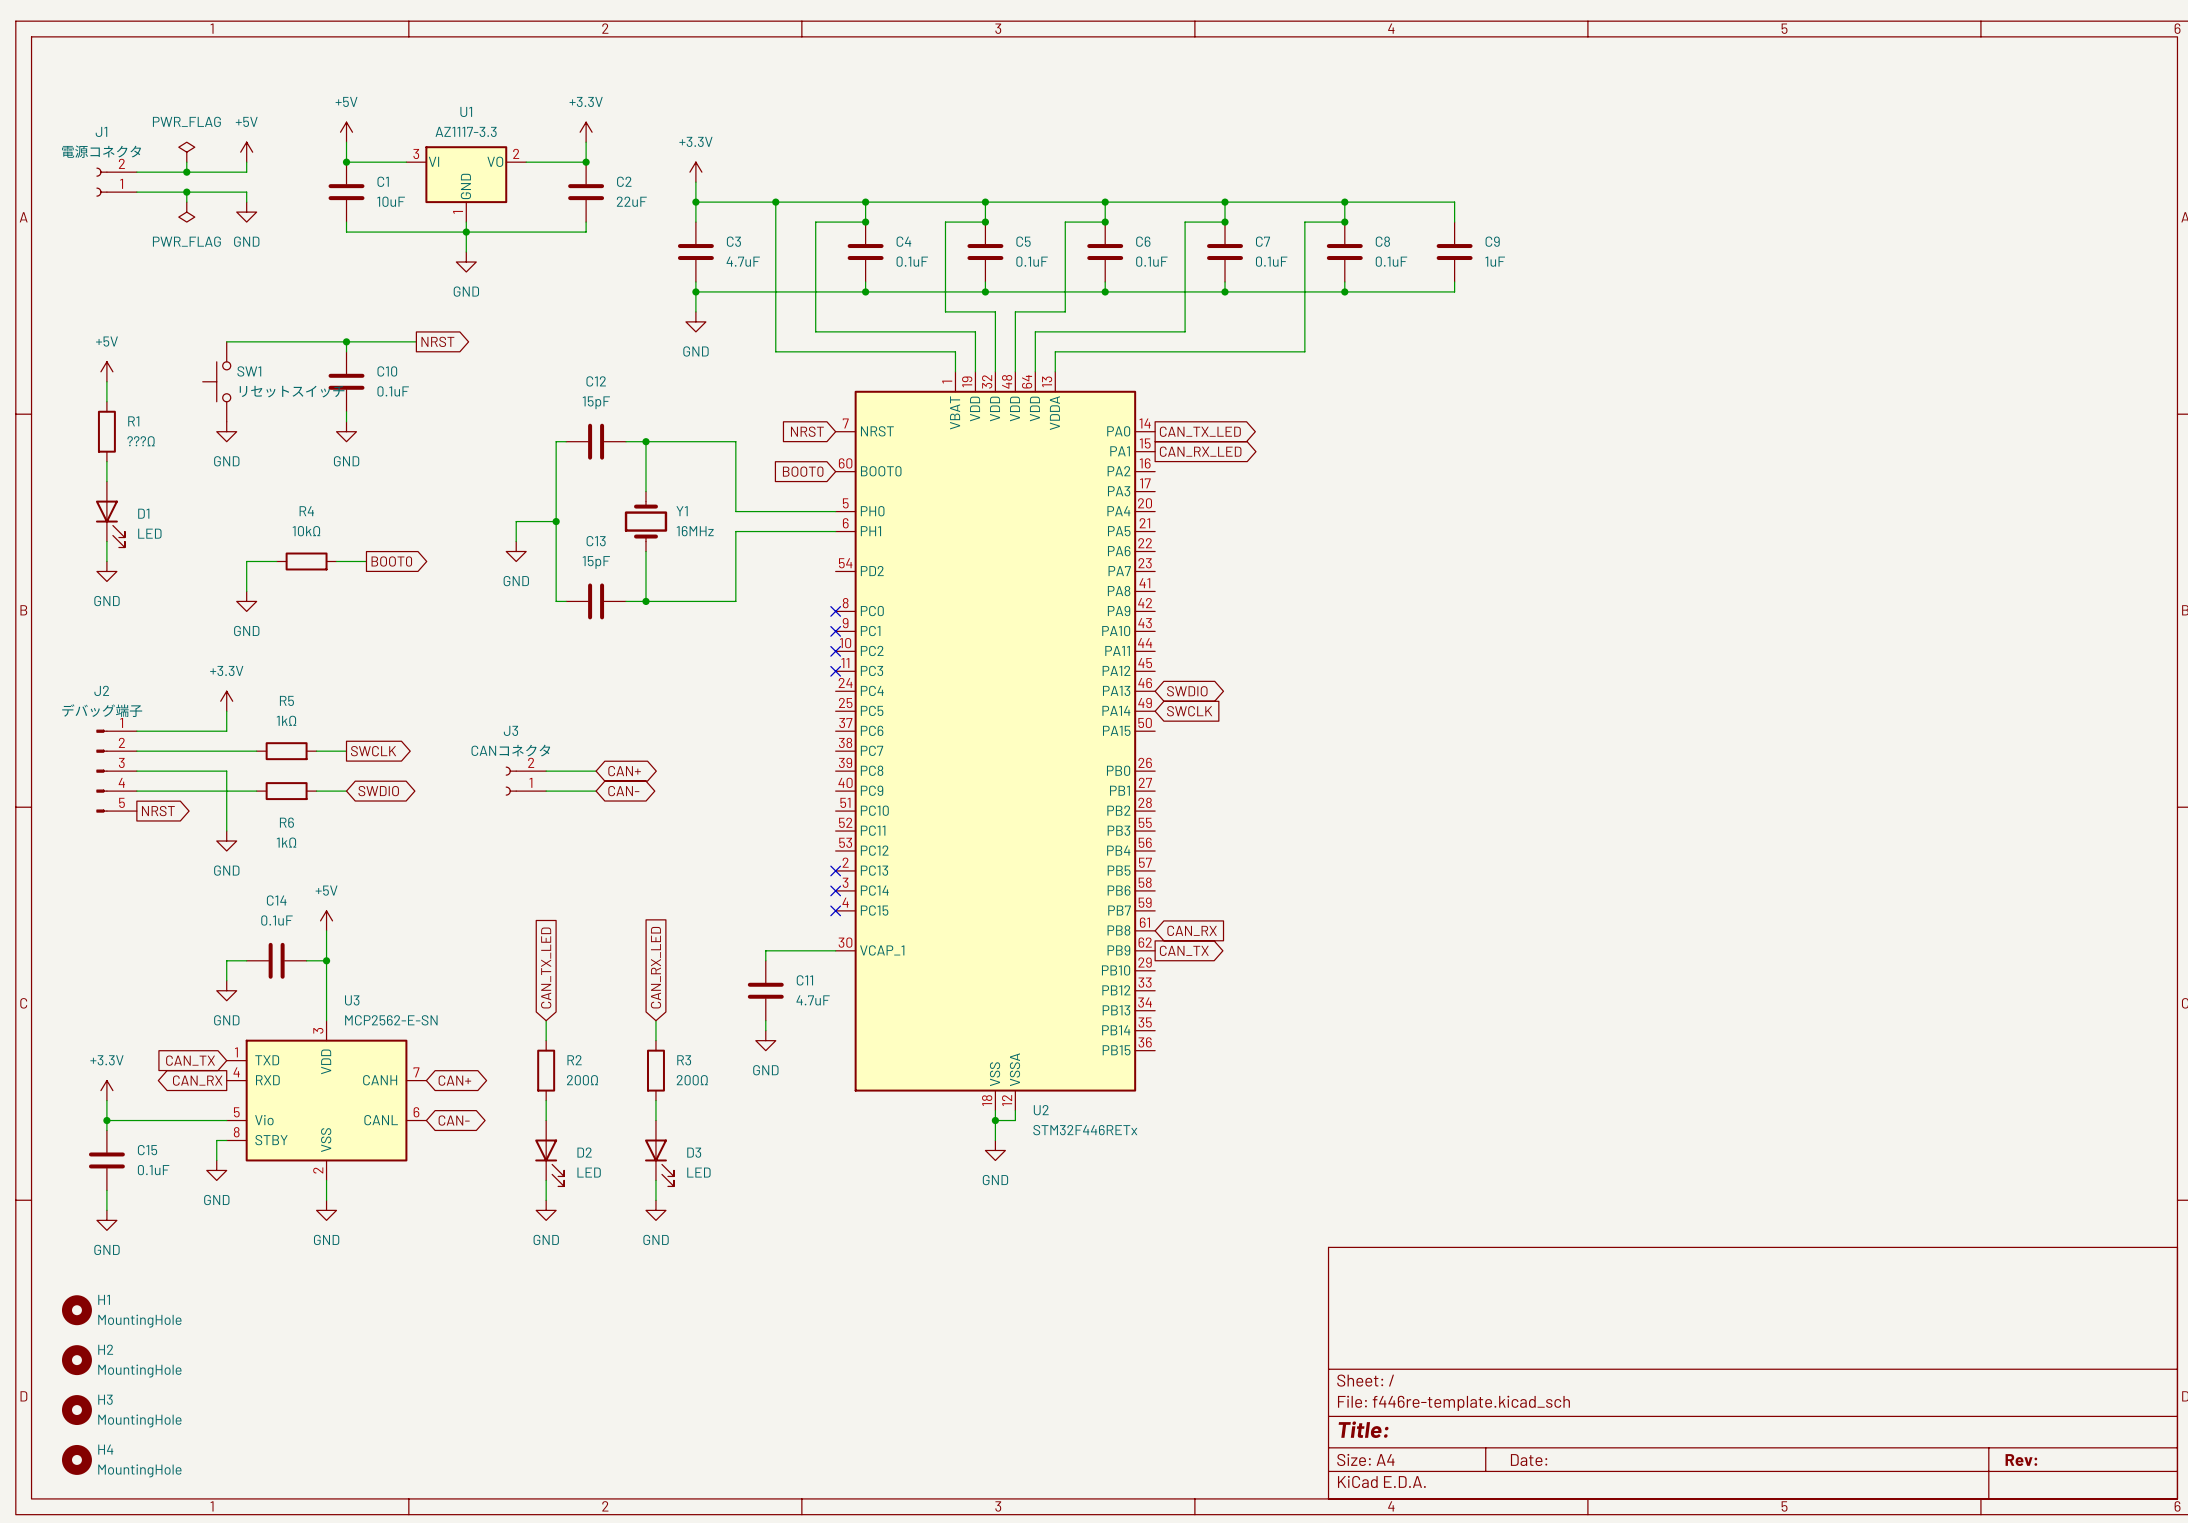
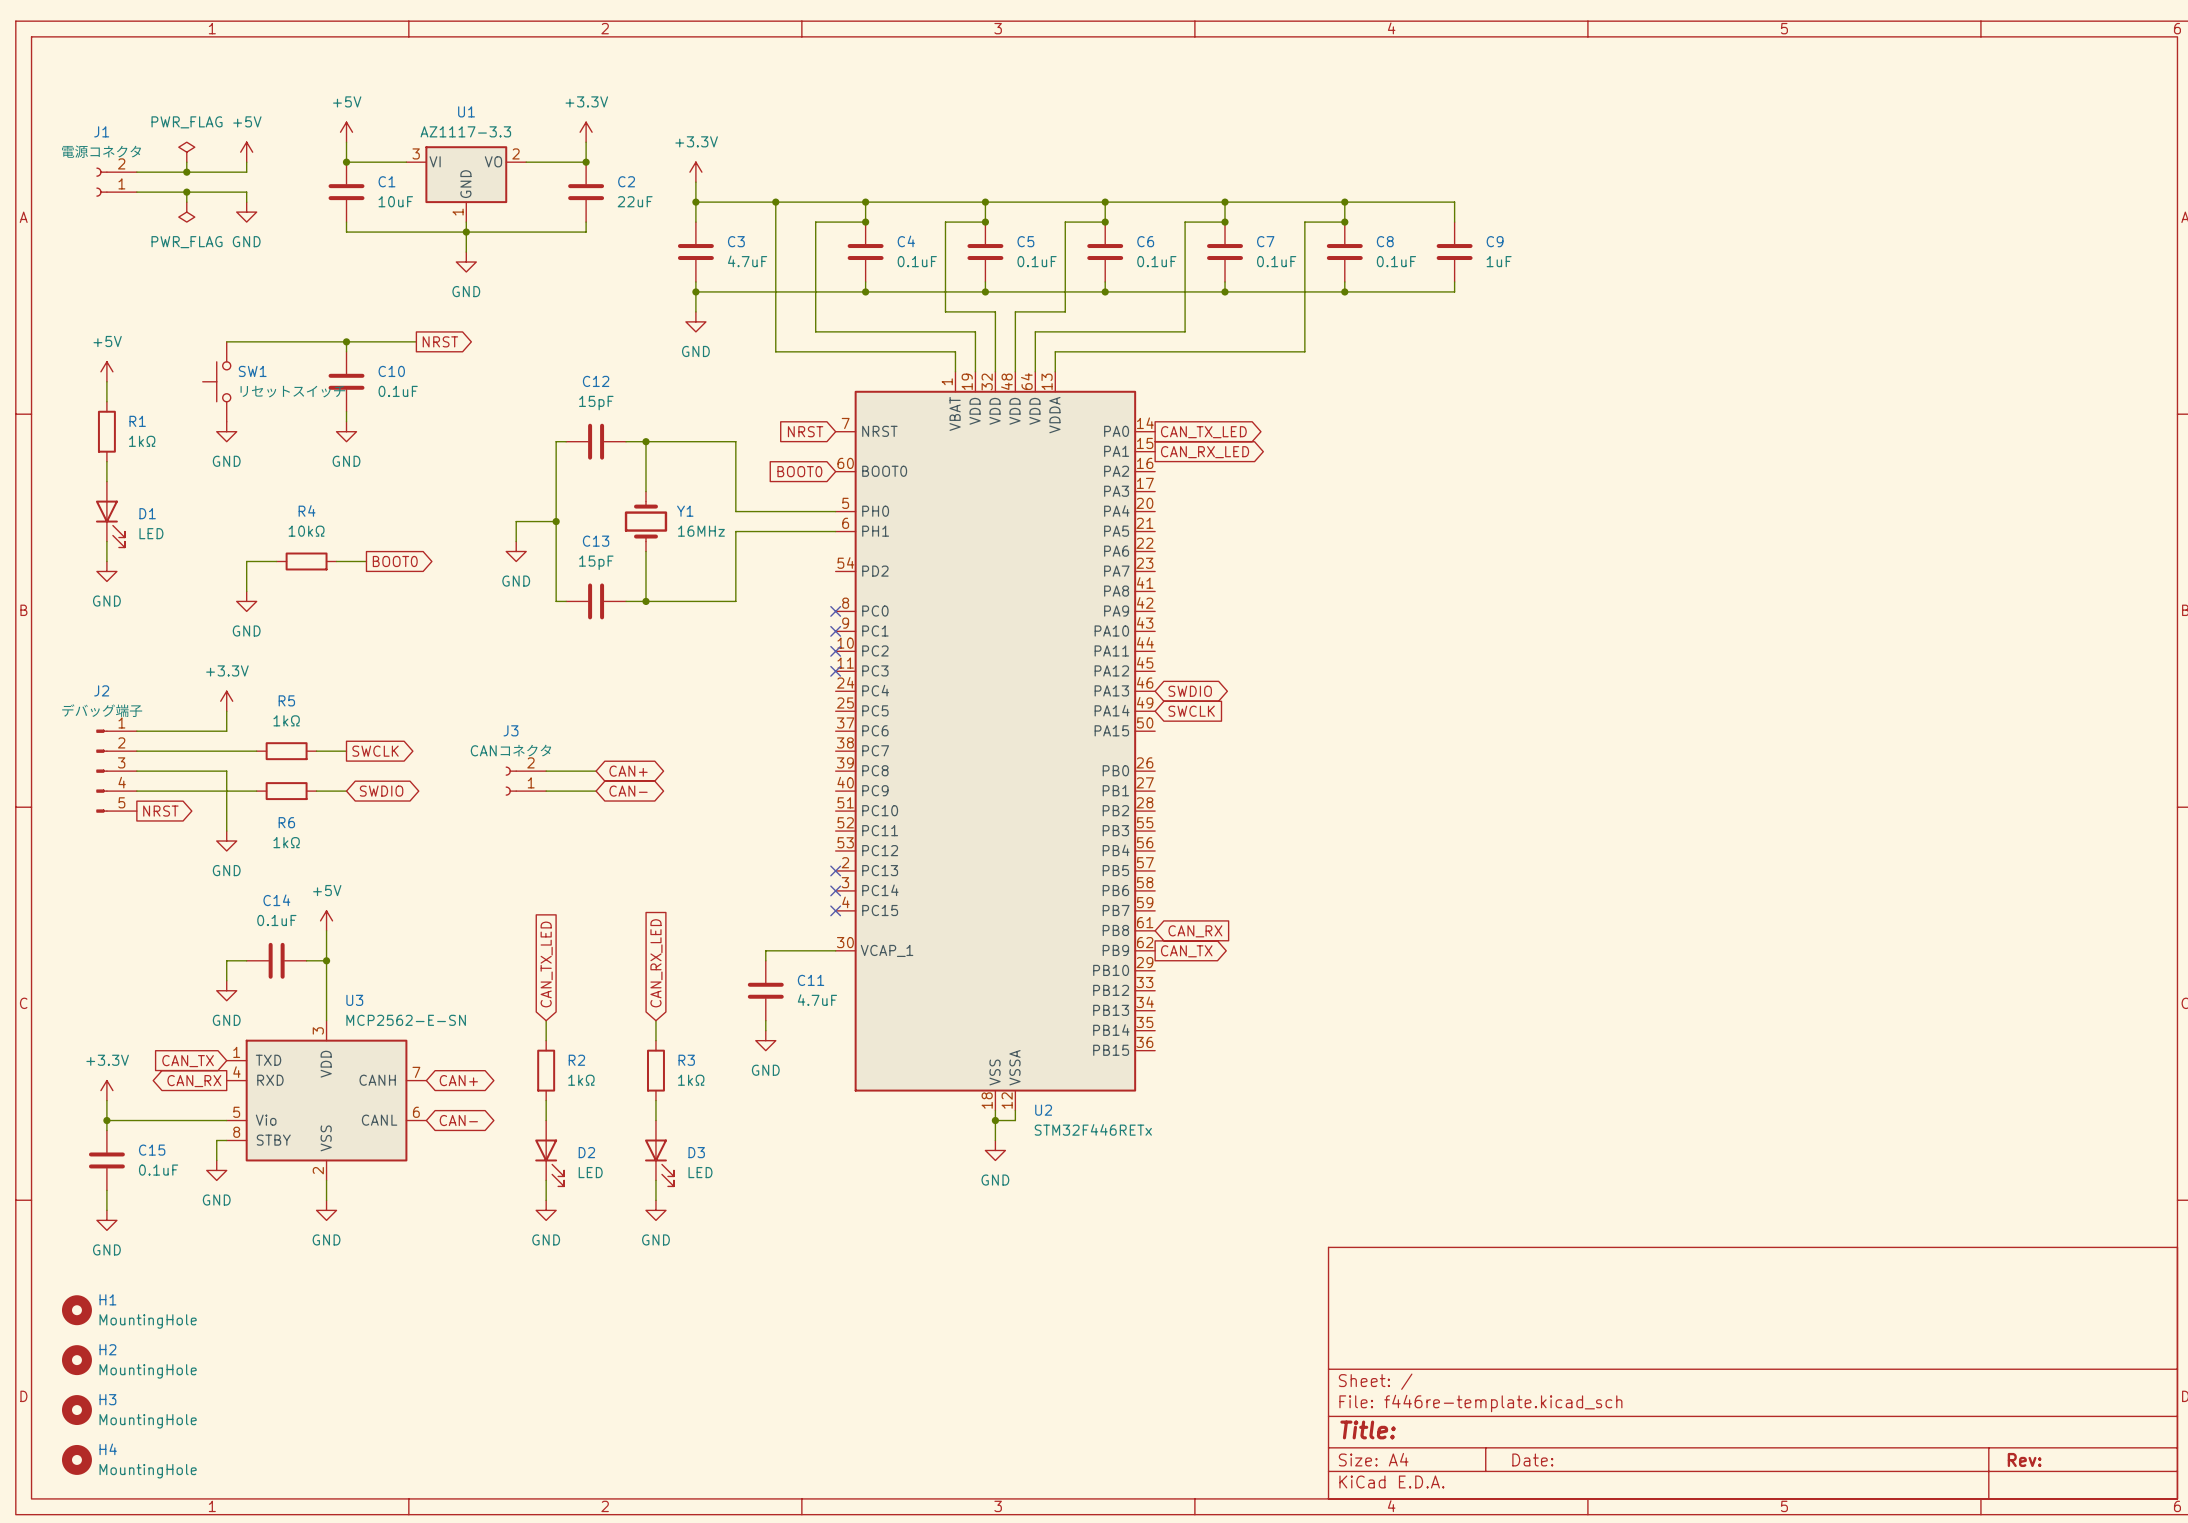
R1 value: ???Ω (141, 441) -> 1kΩ (142, 441)
R2 value: 200Ω (582, 1080) -> 1kΩ (581, 1080)
R3 value: 200Ω (692, 1080) -> 1kΩ (691, 1080)

